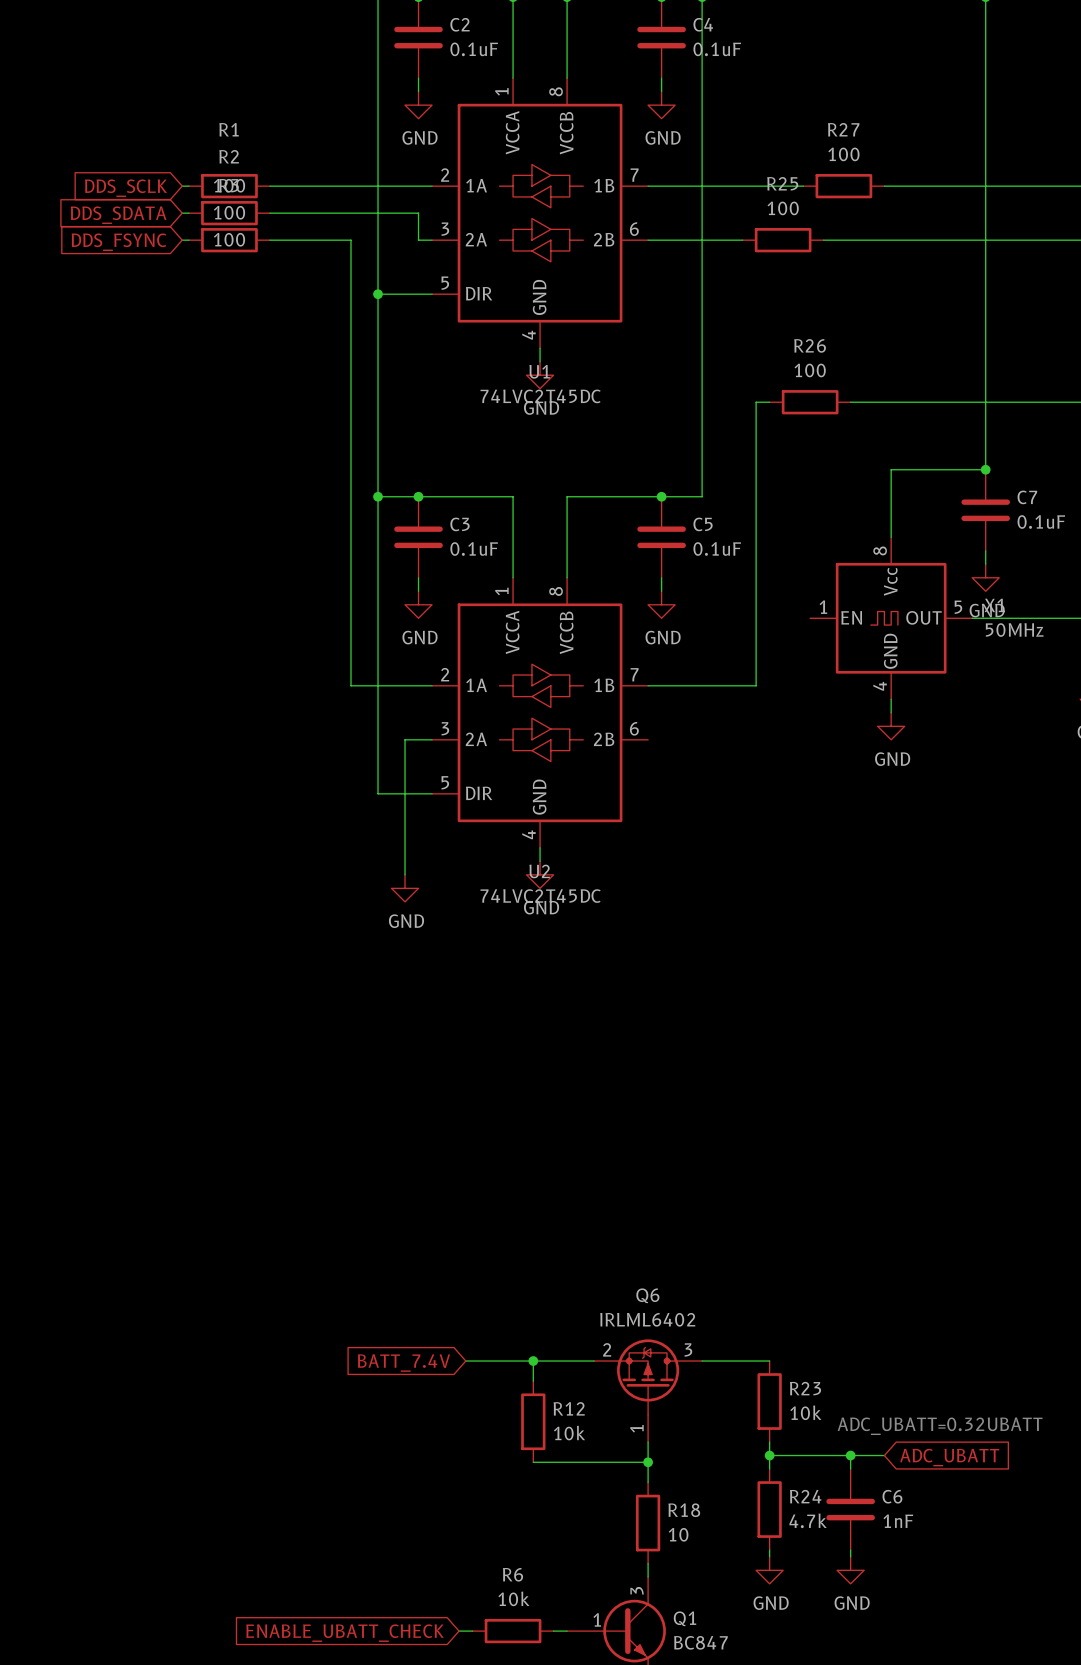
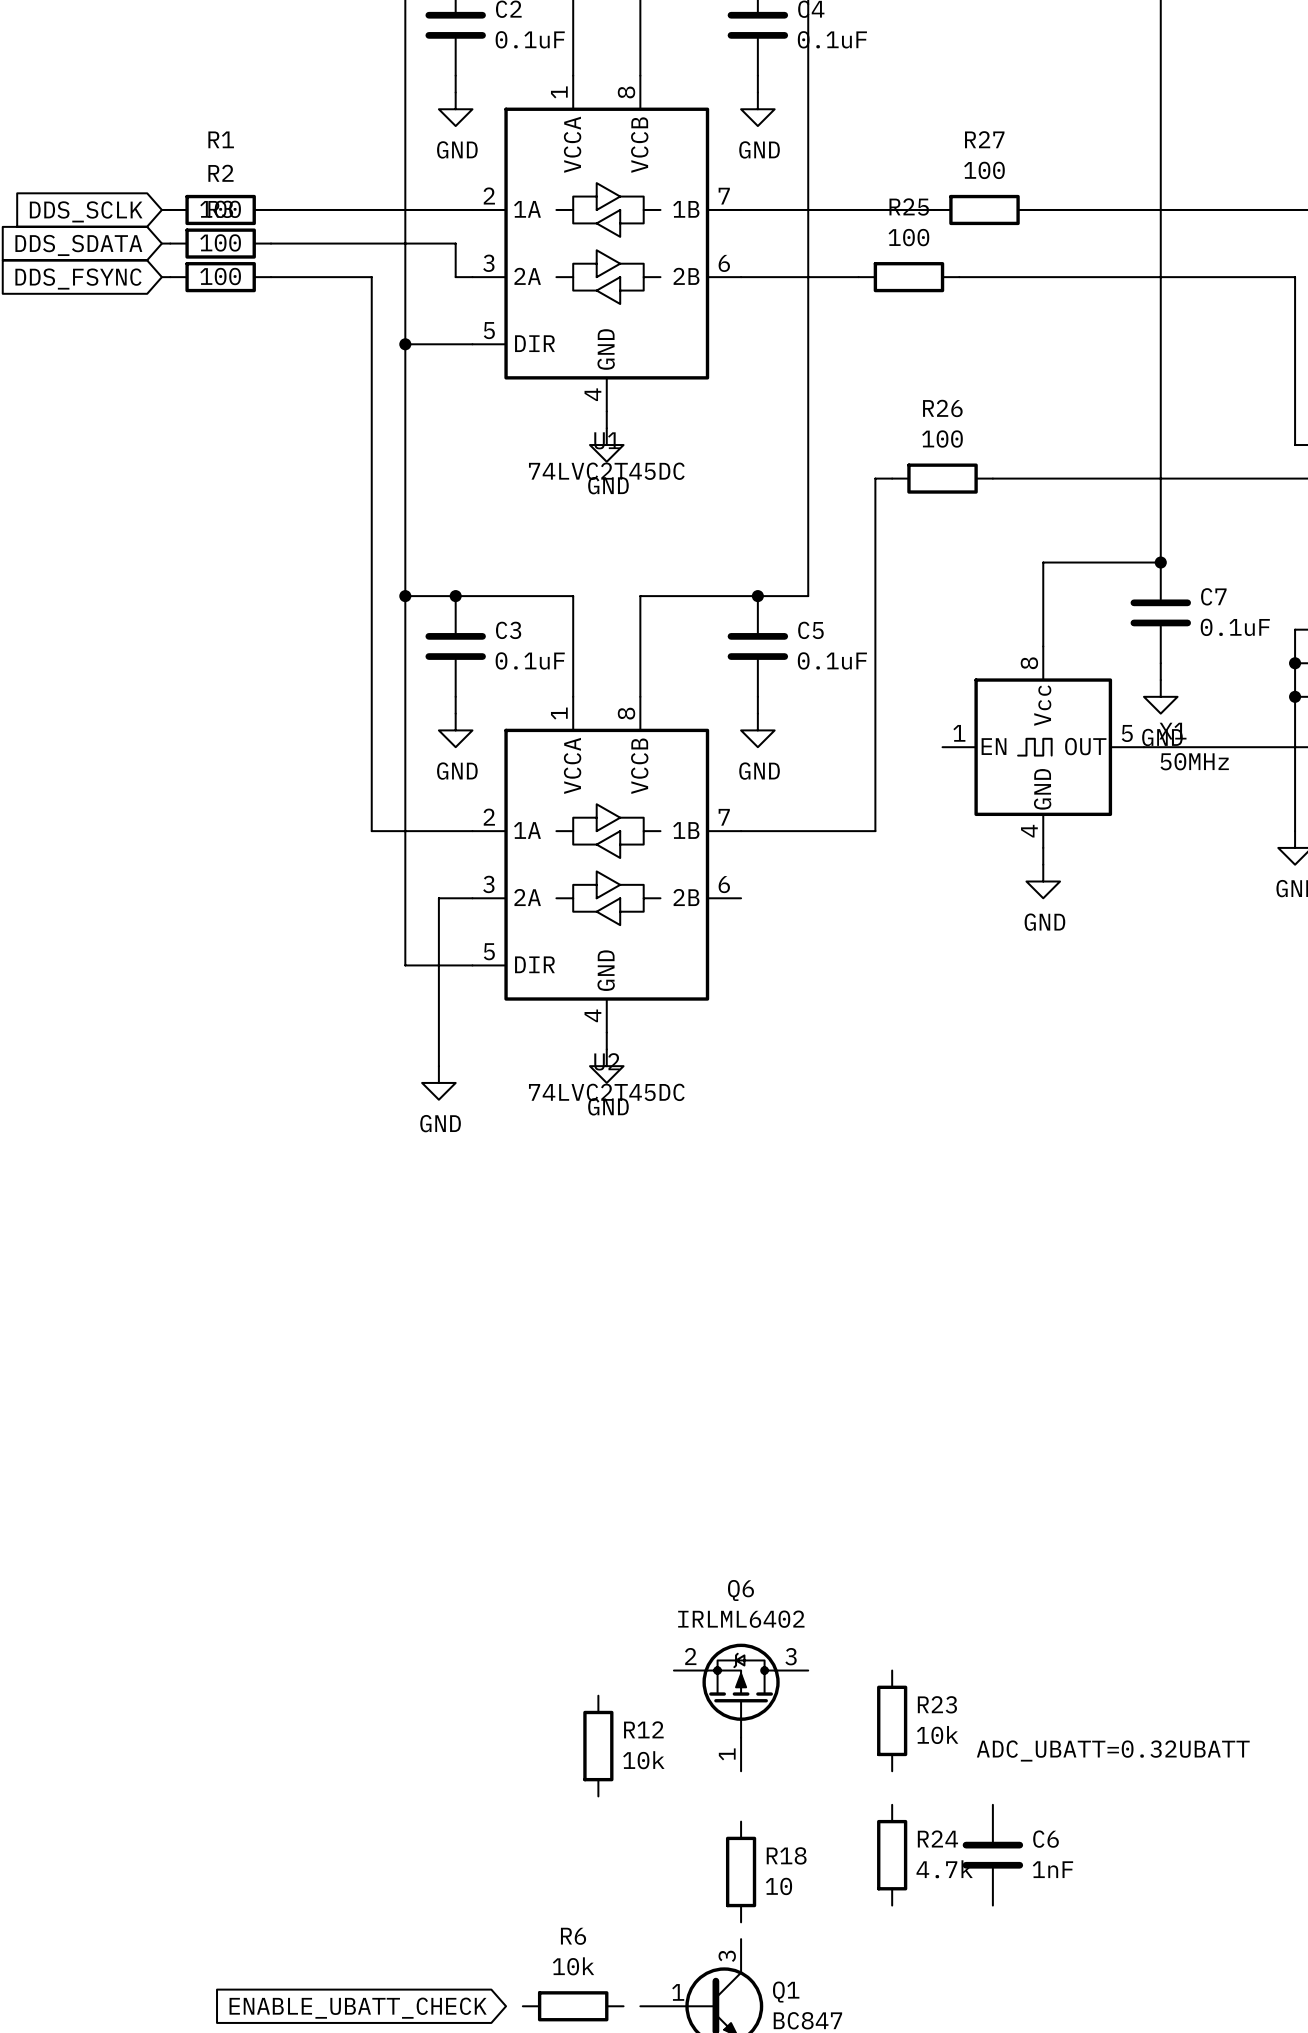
wire: (465, 1361) (594, 1361) -> none
wire: (533, 1361) (533, 1381) -> none
junction: (533, 1361) -> none
wire: (702, 1361) (769, 1361) -> none
global label: BATT_7.4V (403, 1363) -> none
wire: (648, 1442) (648, 1482) -> none
wire: (769, 1442) (769, 1469) -> none
wire: (769, 1455) (884, 1455) -> none
junction: (769, 1455) -> none
wire: (850, 1455) (850, 1469) -> none
junction: (850, 1455) -> none
global label: ADC_UBATT (949, 1457) -> none
wire: (533, 1462) (648, 1462) -> none
junction: (648, 1462) -> none
wire: (769, 1550) (769, 1556) -> none
wire: (850, 1550) (850, 1556) -> none
wire: (648, 1563) (648, 1577) -> none
power symbol: GND (769, 1570) -> none
power symbol: GND (850, 1570) -> none
wire: (459, 1631) (472, 1631) -> none
wire: (553, 1631) (567, 1631) -> none

